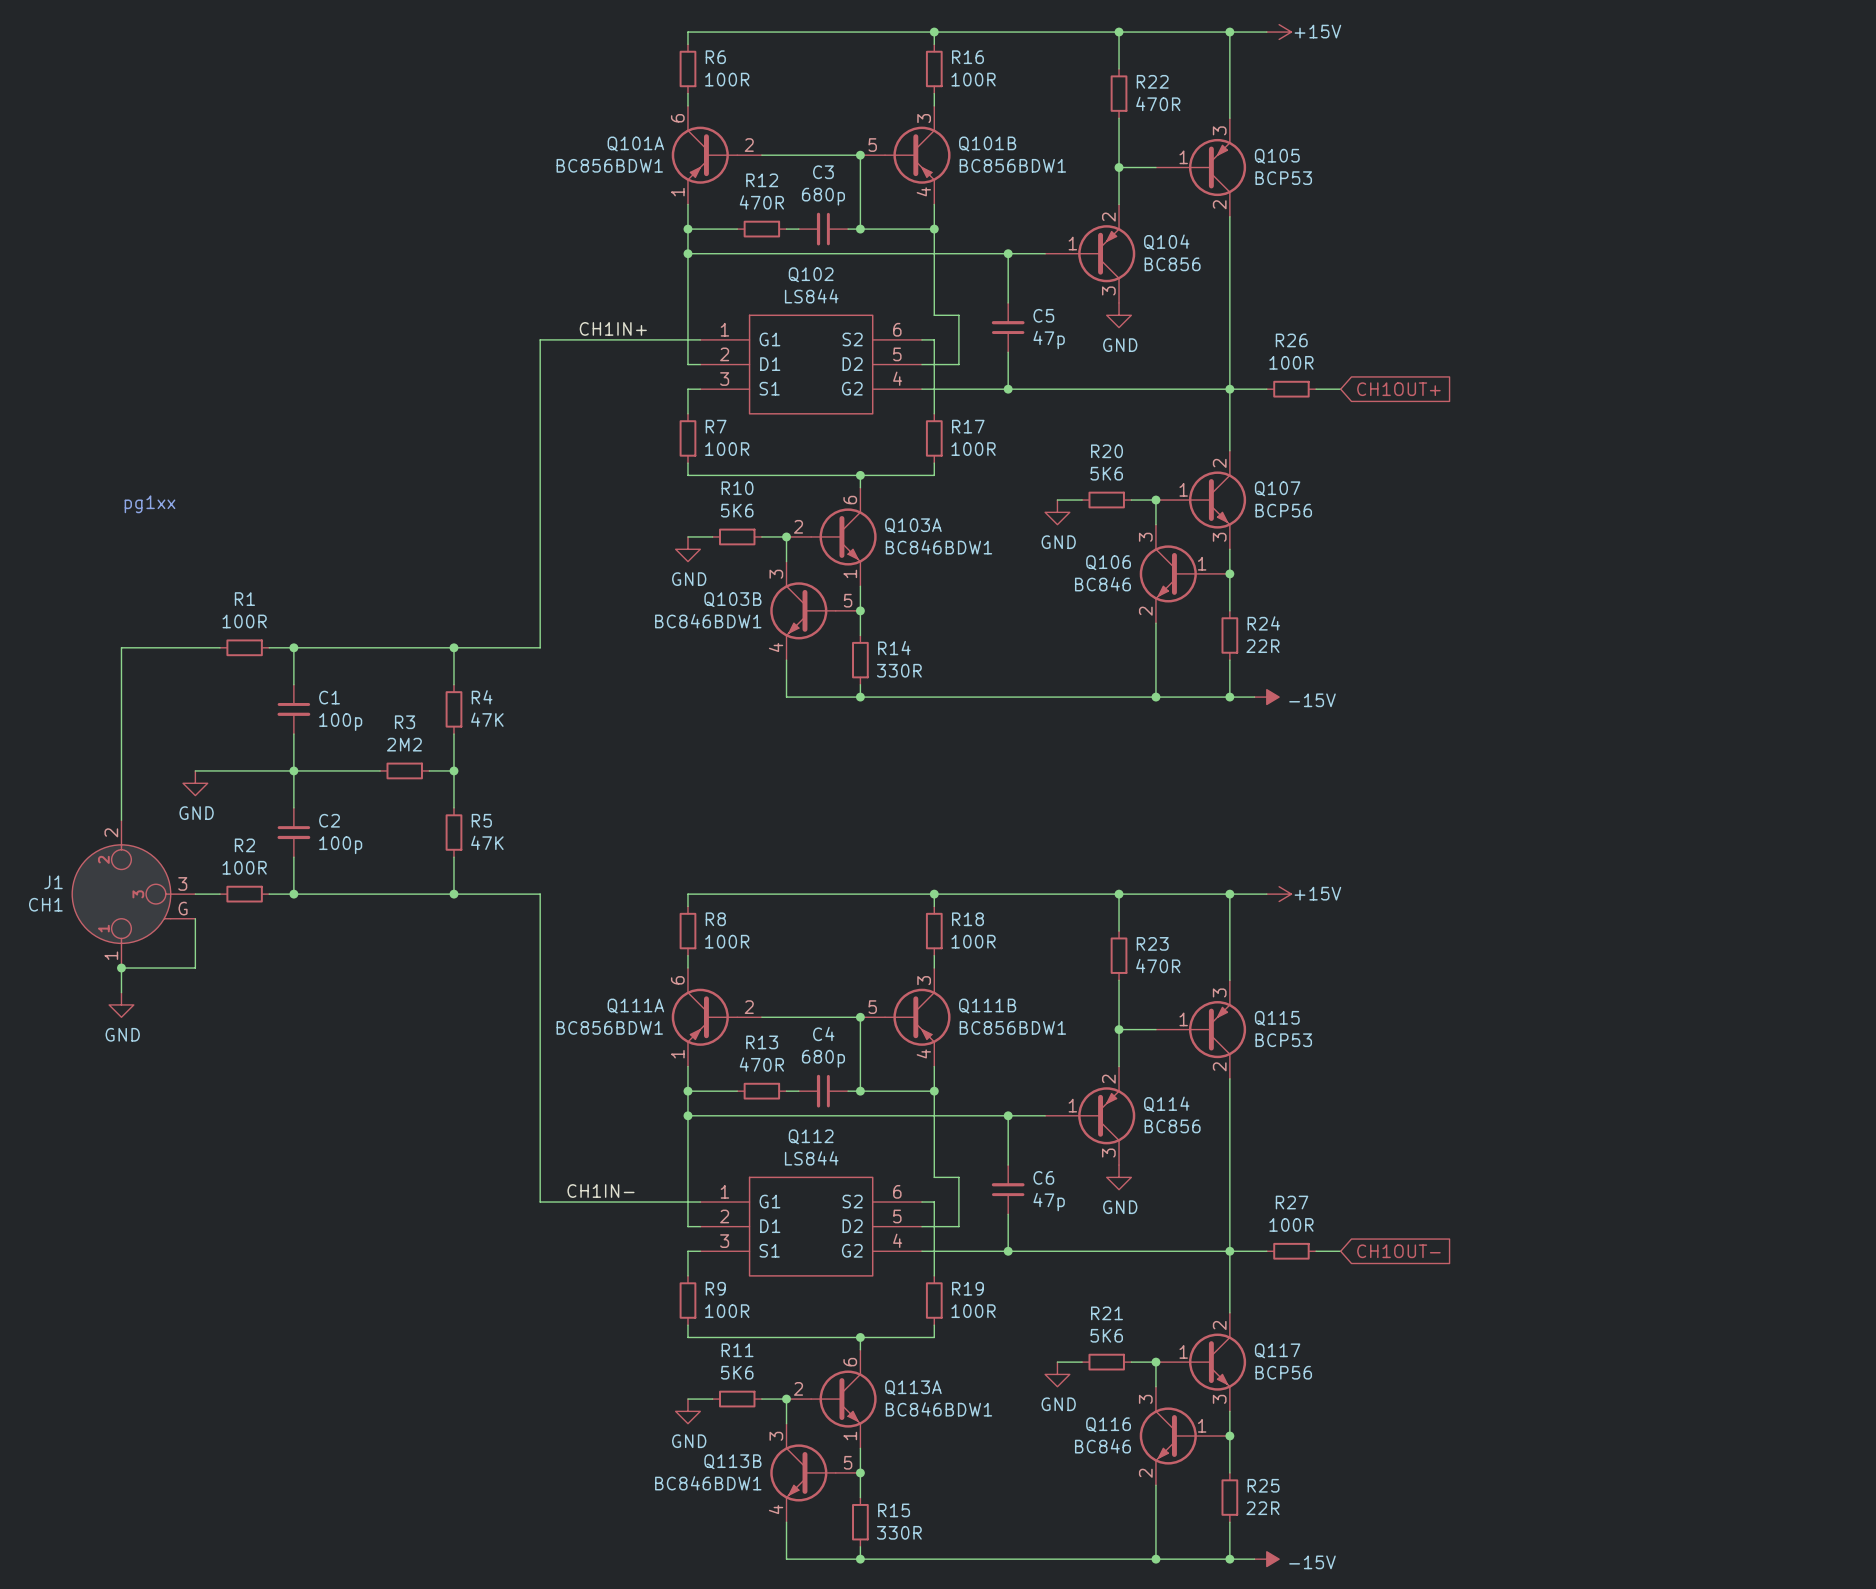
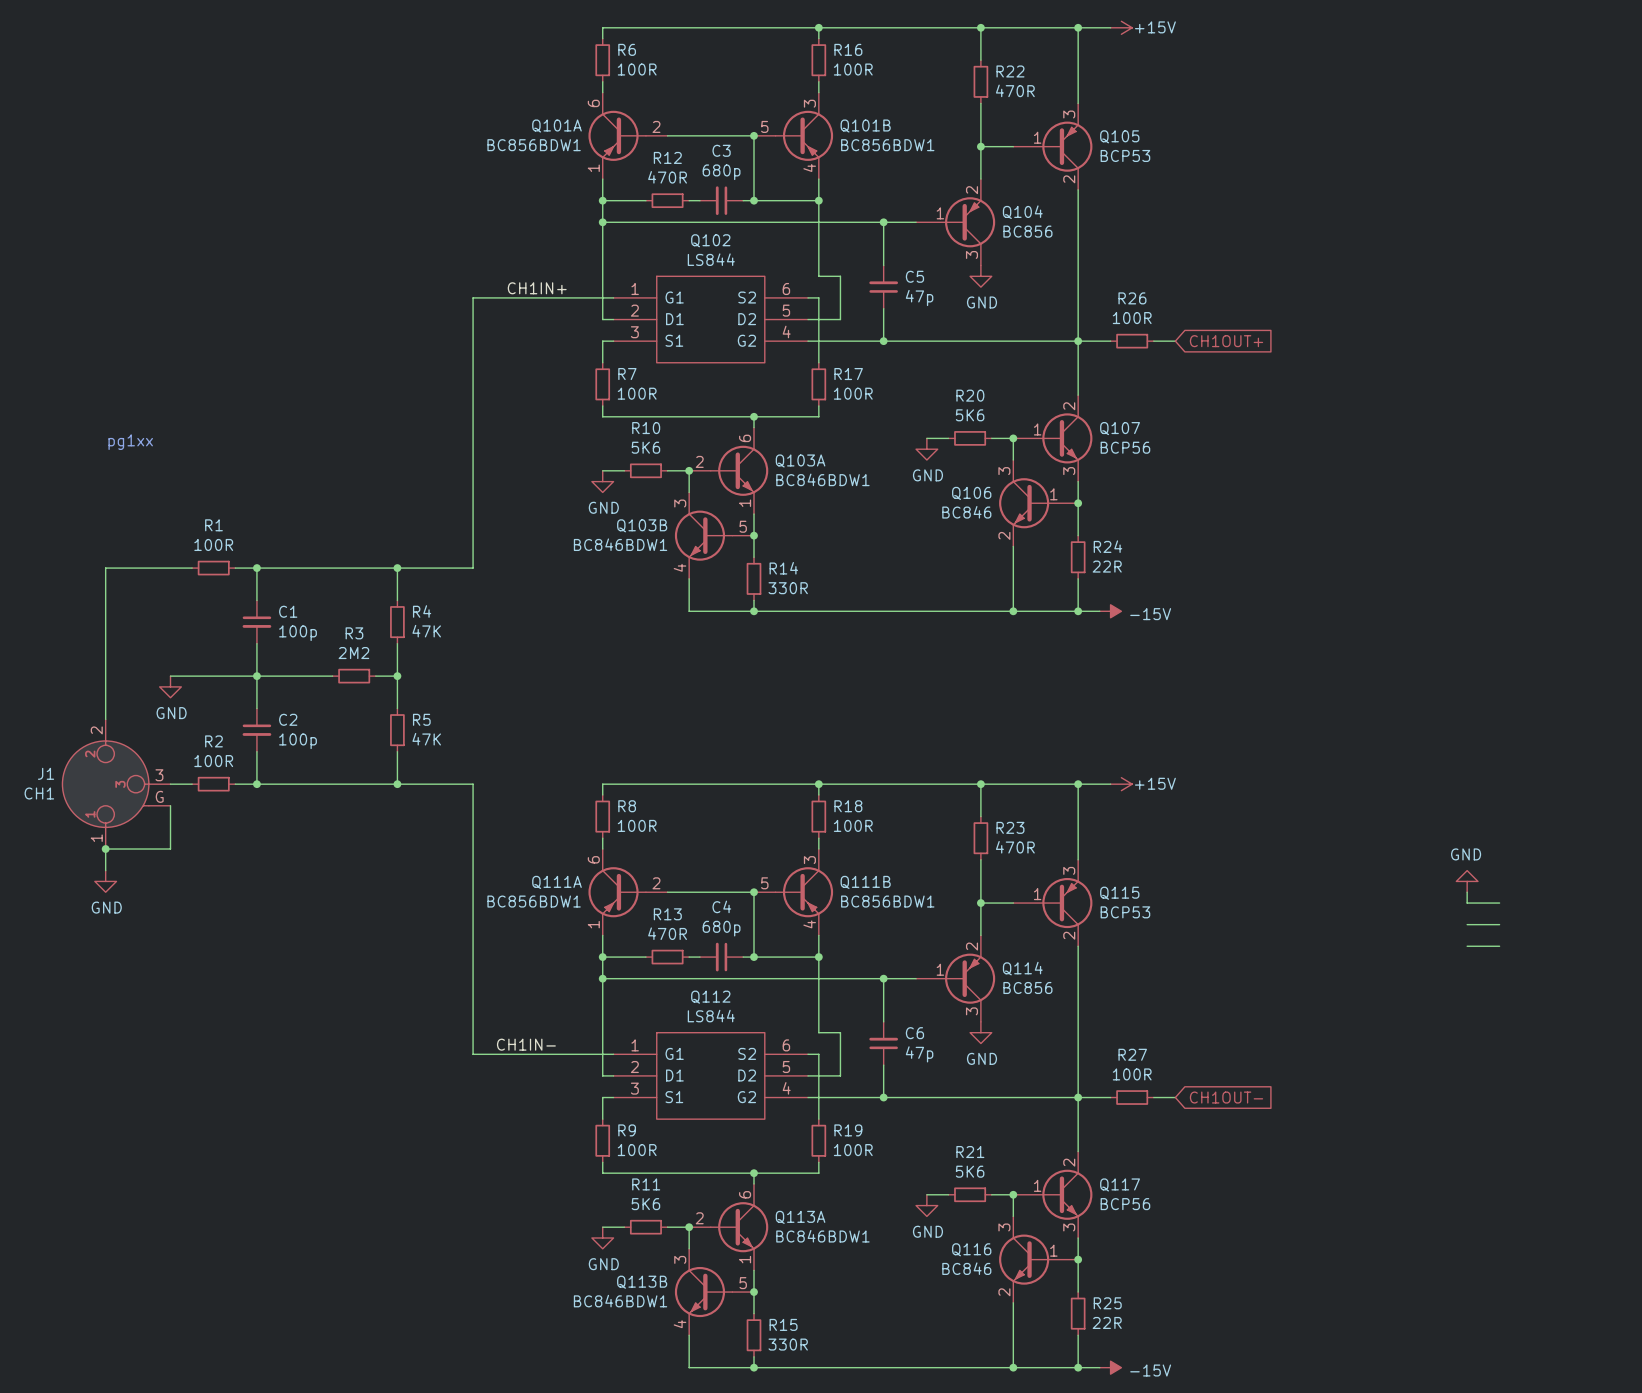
power symbol: none -> GND (1467, 881)
wire: none -> (1467, 892) (1467, 903) (1499, 903)
wire: none -> (1467, 924) (1499, 924)
wire: none -> (1467, 946) (1499, 946)

